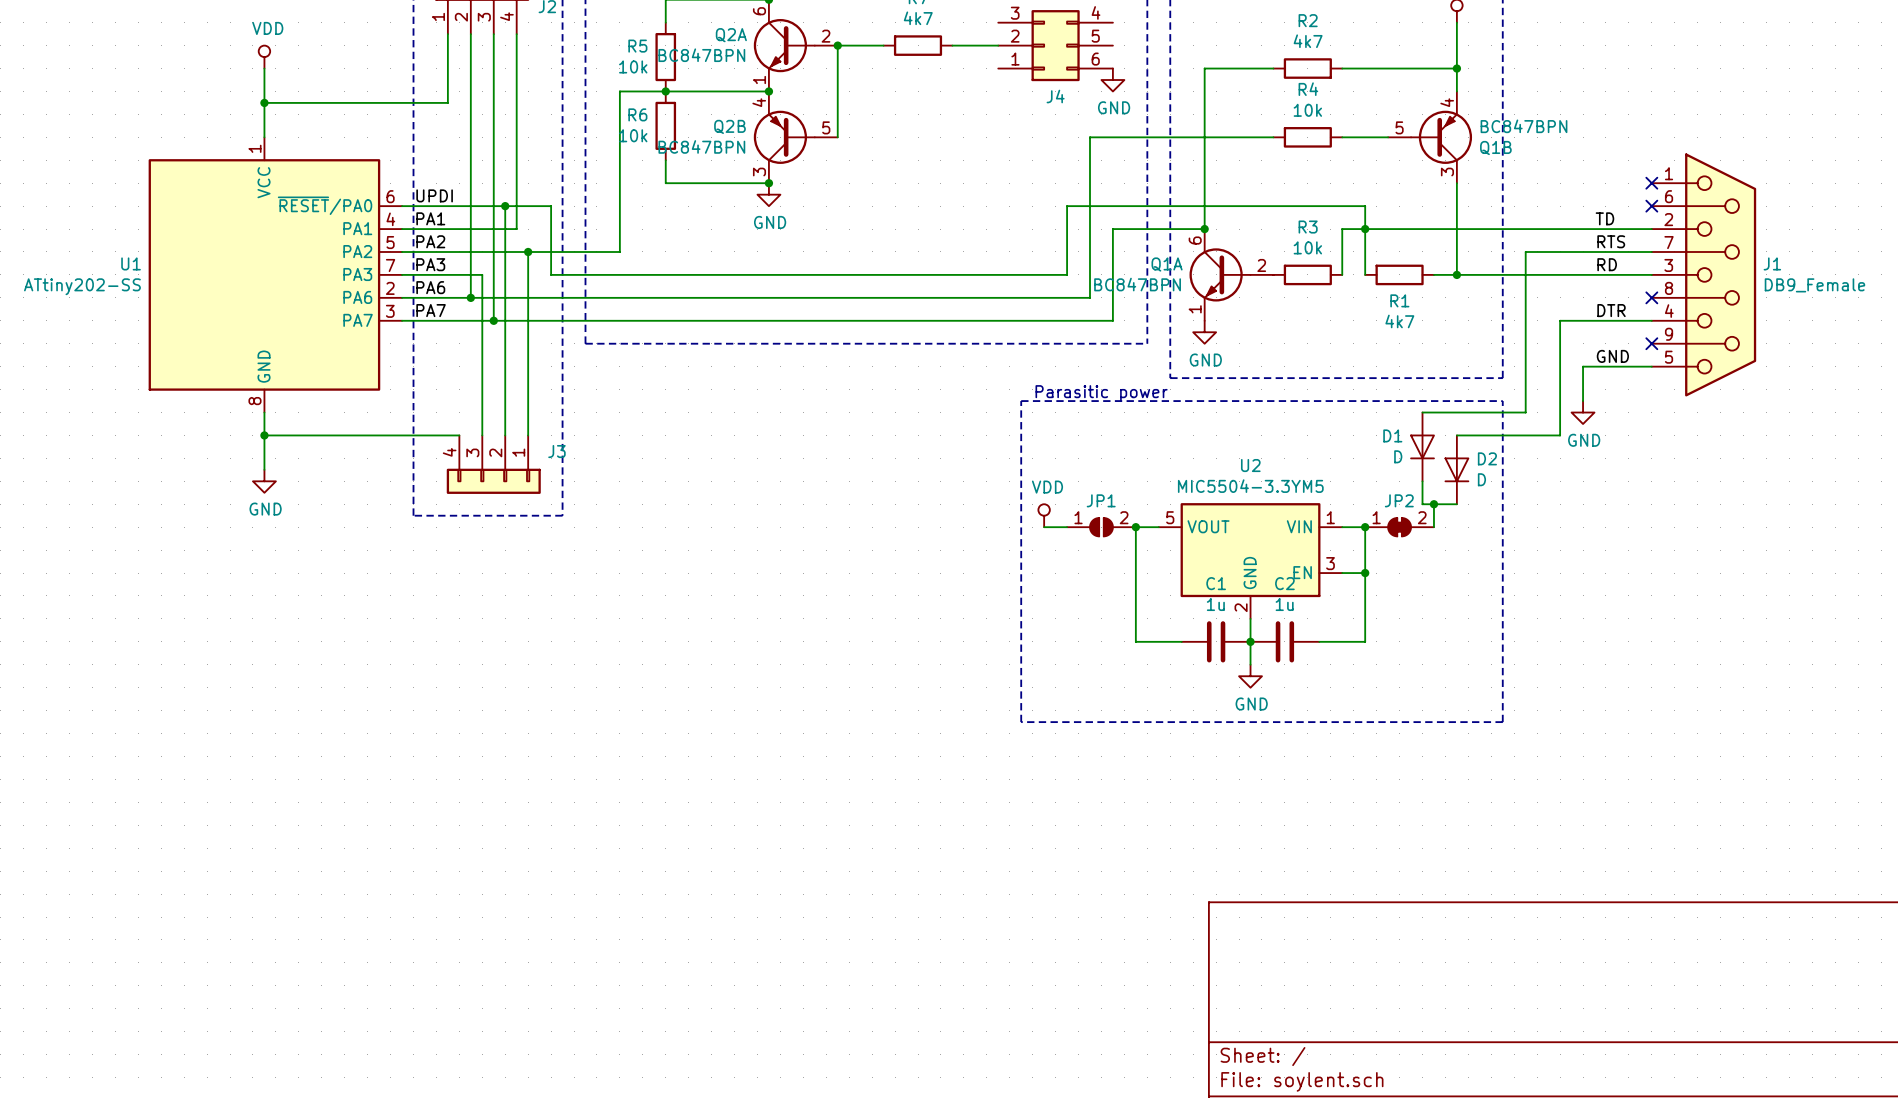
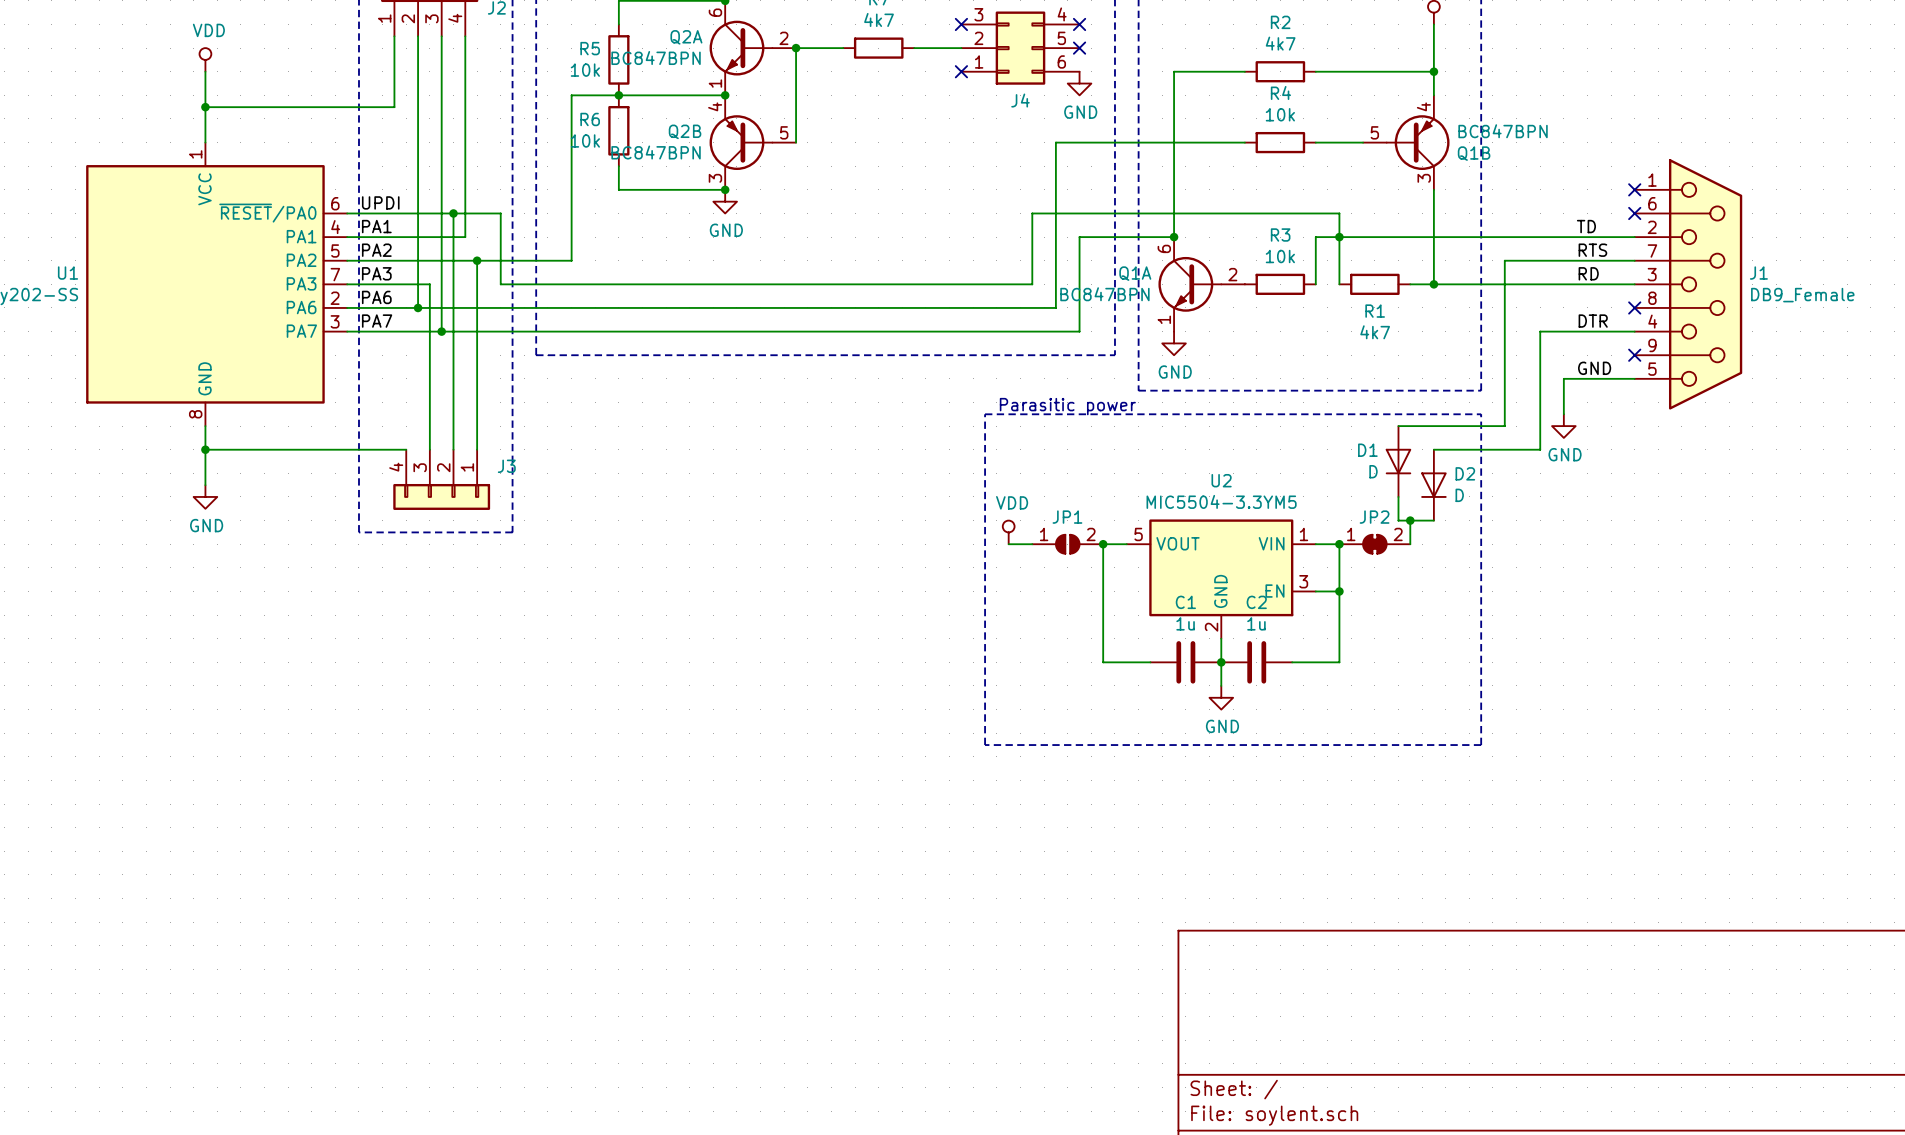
no-connect mark: none -> (961, 24)
no-connect mark: none -> (1079, 24)
no-connect mark: none -> (1079, 48)
no-connect mark: none -> (961, 71)

